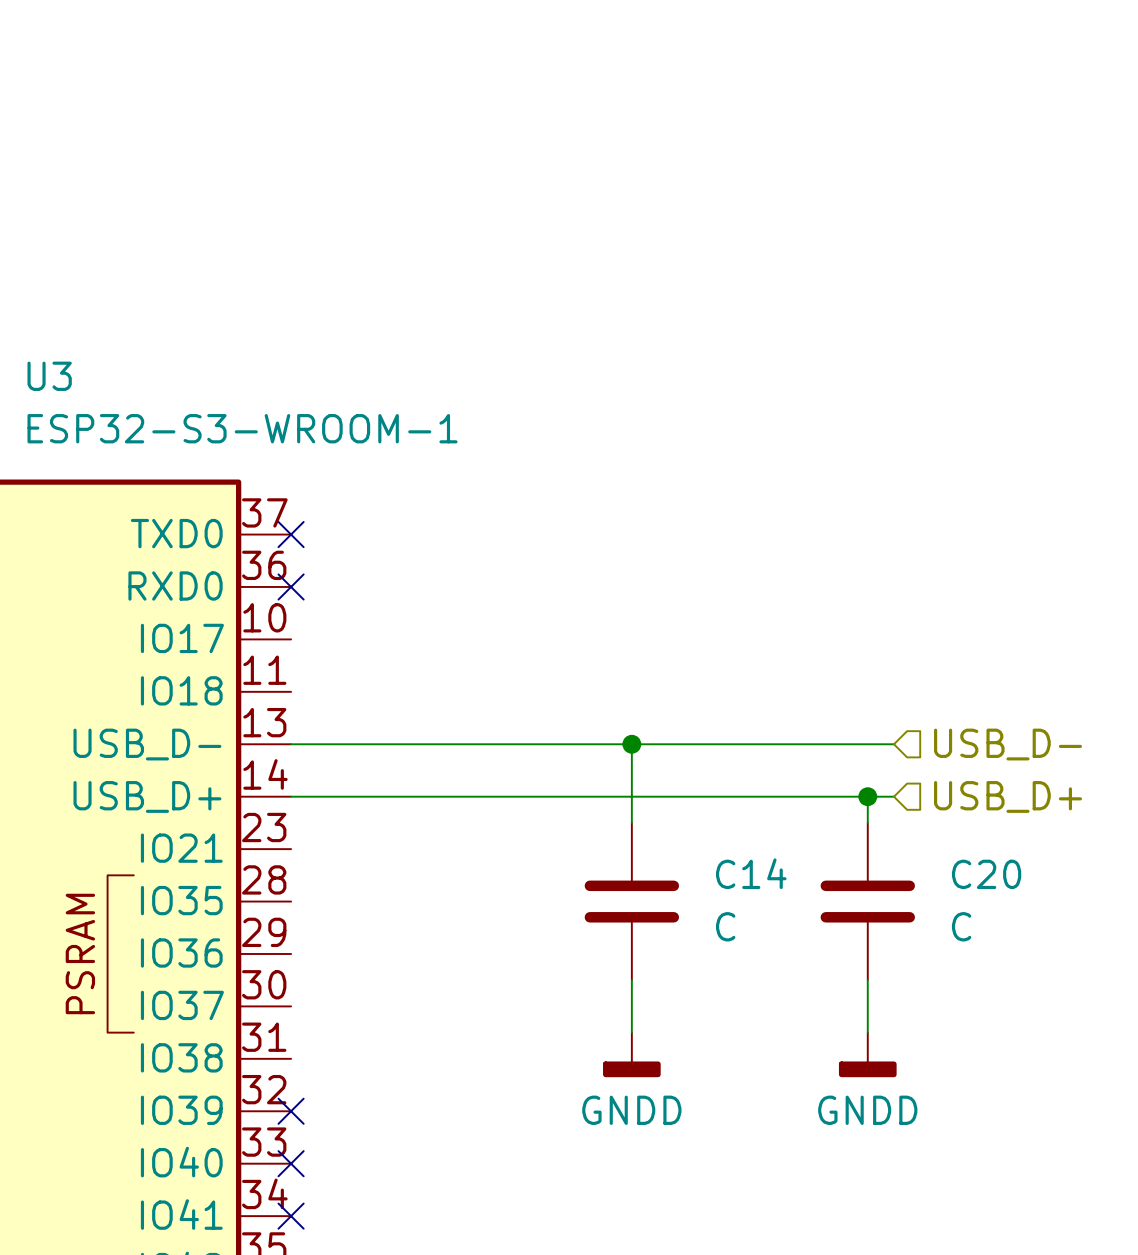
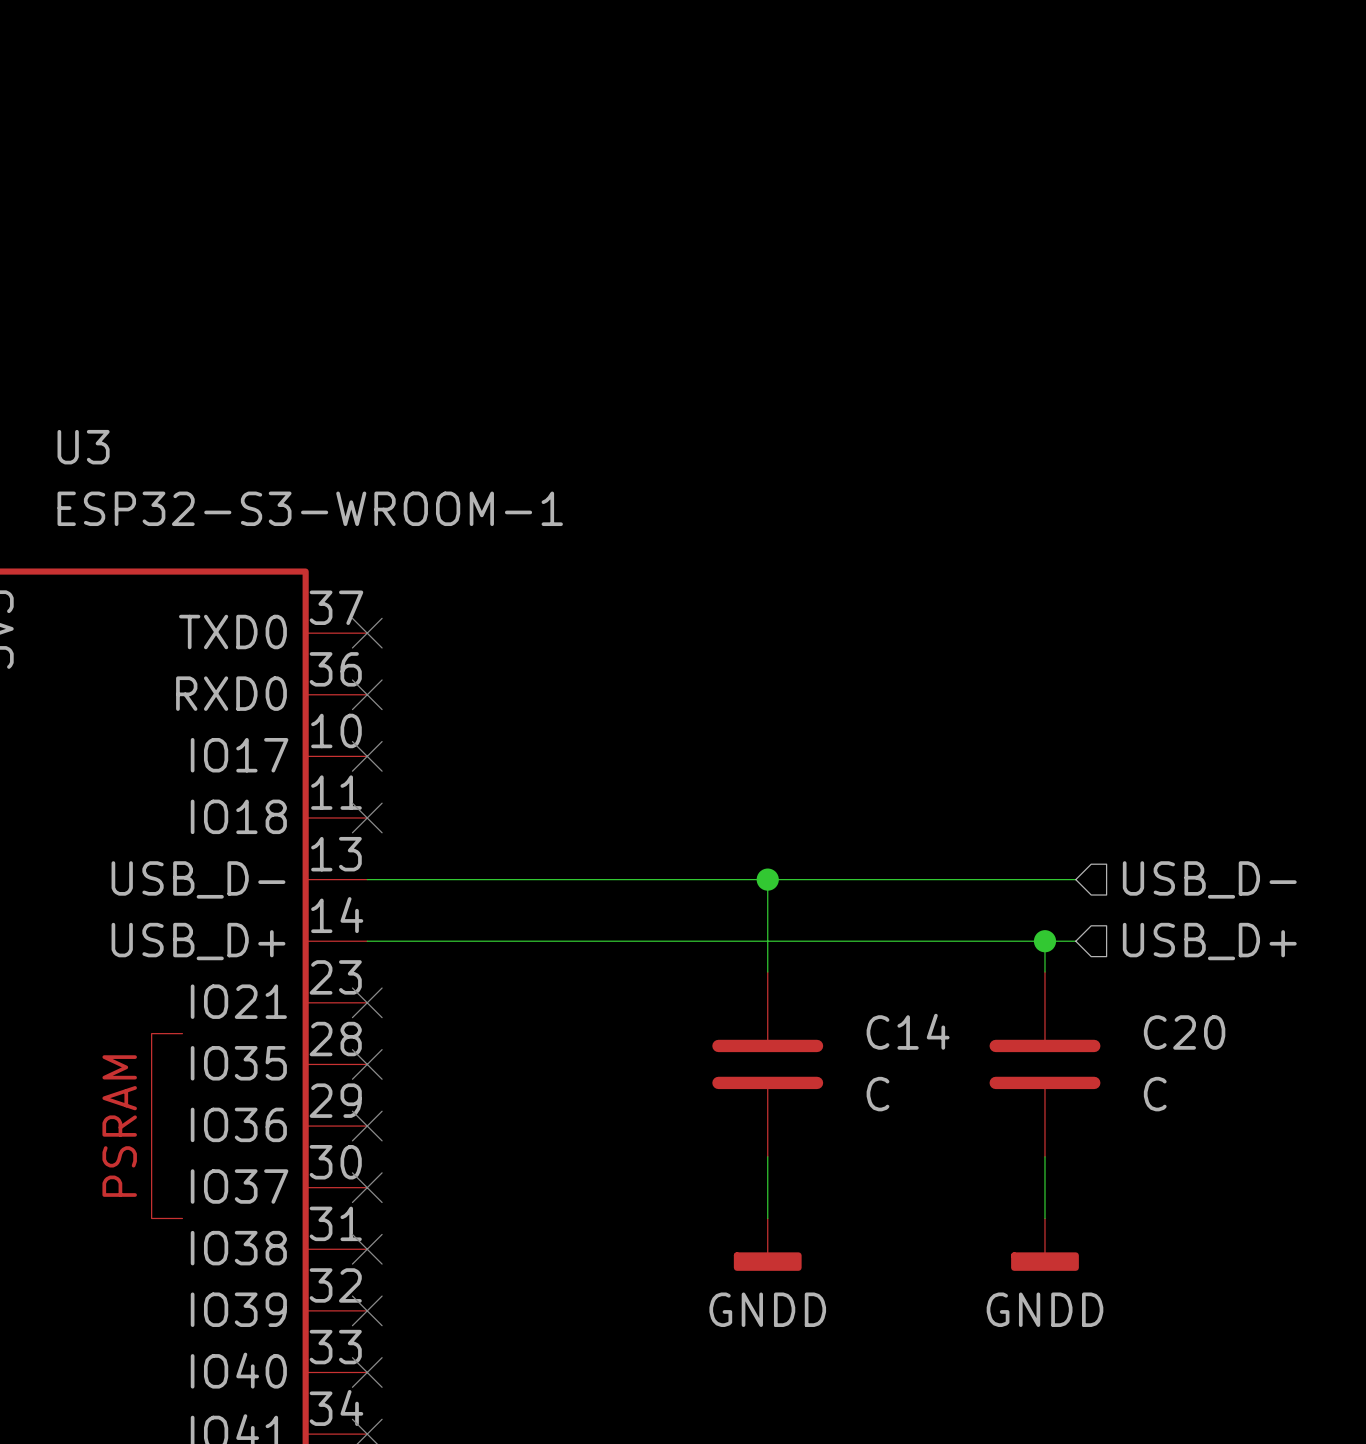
no-connect mark: none -> (367, 756)
no-connect mark: none -> (367, 817)
no-connect mark: none -> (367, 1002)
no-connect mark: none -> (367, 1064)
no-connect mark: none -> (367, 1126)
no-connect mark: none -> (367, 1187)
no-connect mark: none -> (367, 1249)

